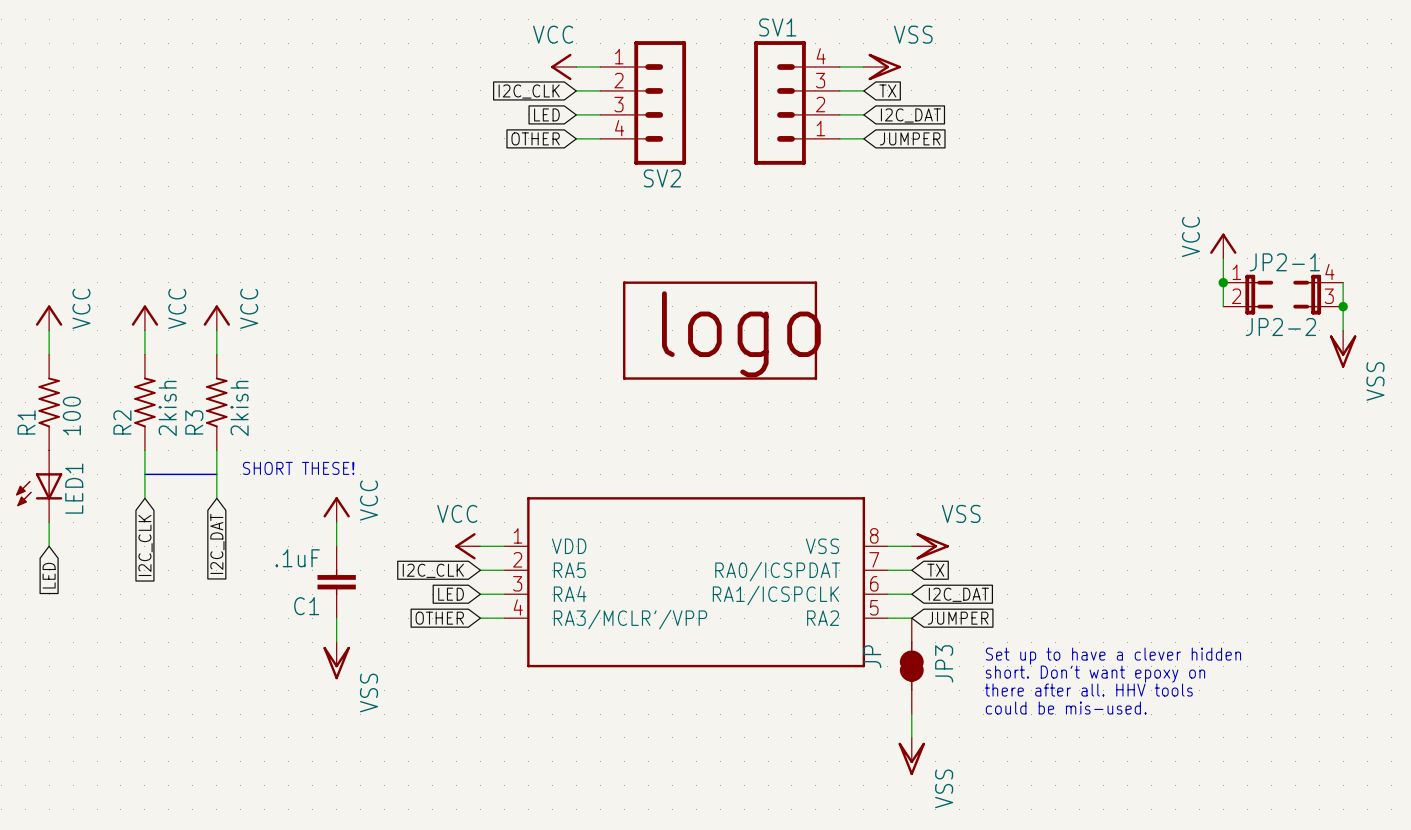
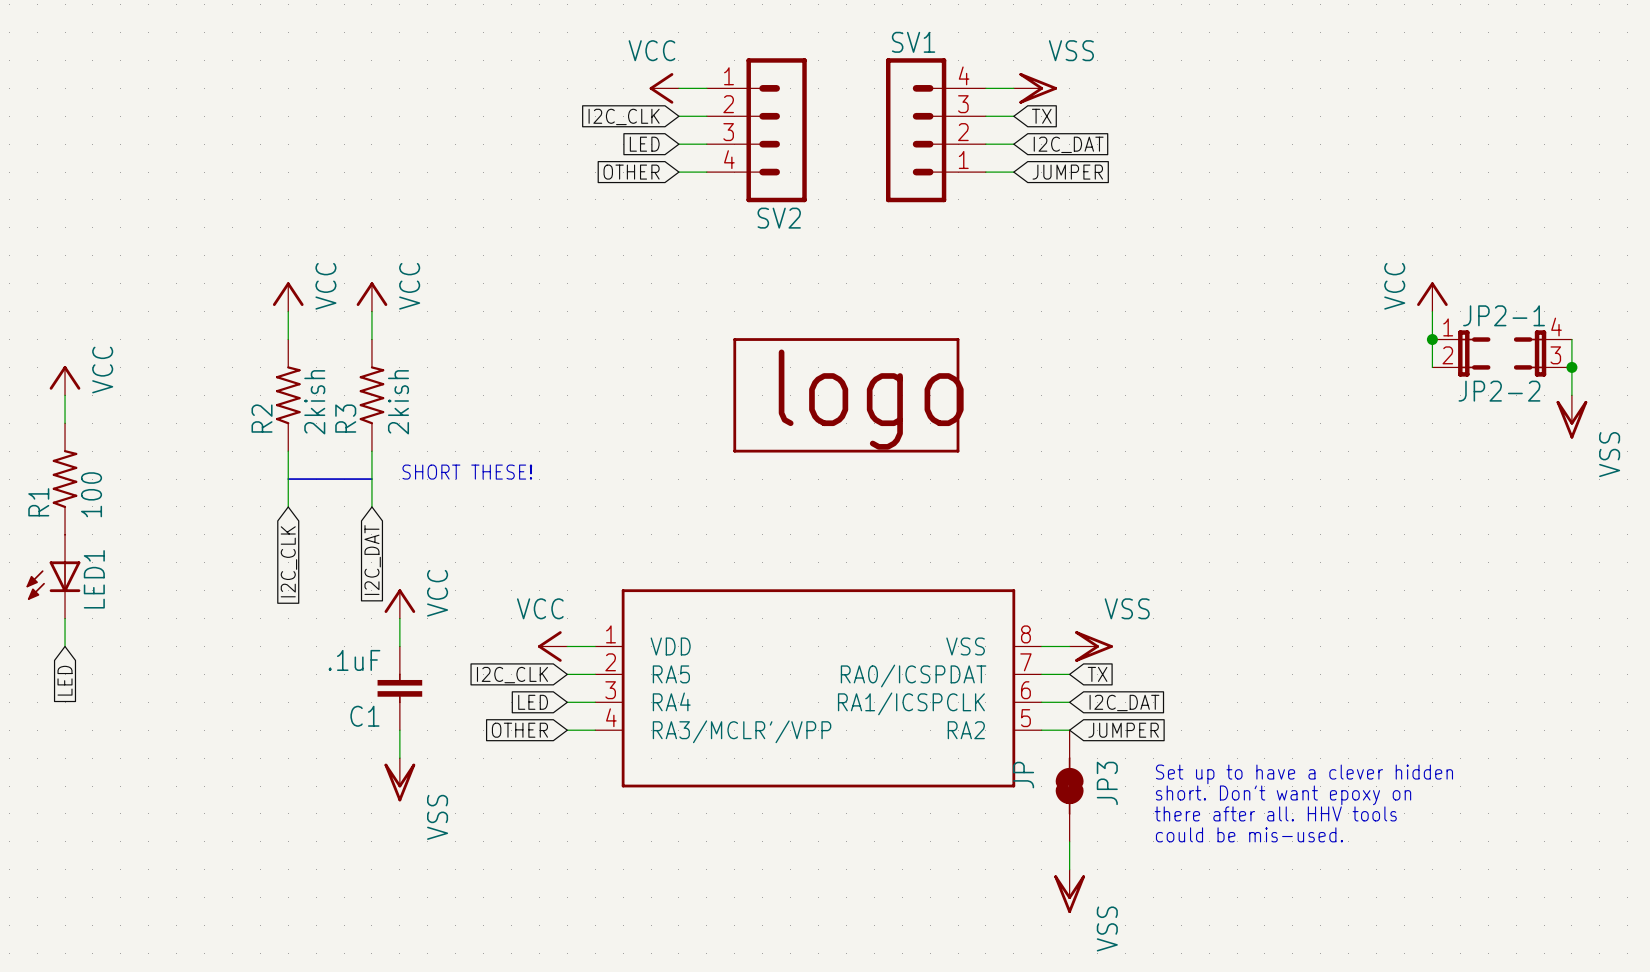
power symbol: none -> VCC (288, 296)
power symbol: none -> VCC (371, 296)
power symbol: VCC (144, 318) -> none
power symbol: VCC (216, 318) -> none
wire: (144, 330) (144, 354) -> (288, 311) (288, 339)
wire: (216, 330) (216, 354) -> (371, 311) (371, 339)
R2 position: (144, 402) -> (288, 395)
R3 position: (216, 402) -> (371, 395)
wire: (144, 450) (144, 498) -> (288, 451) (288, 506)
wire: (216, 450) (216, 498) -> (371, 451) (371, 506)
text position: SHORT THESE! (298, 468) -> SHORT THESE! (467, 472)
line: (144, 474) (216, 474) -> (288, 479) (371, 479)
global label position: I2C_DAT (217, 543) -> I2C_DAT (372, 560)
global label position: I2C_CLK (145, 545) -> I2C_CLK (288, 561)

